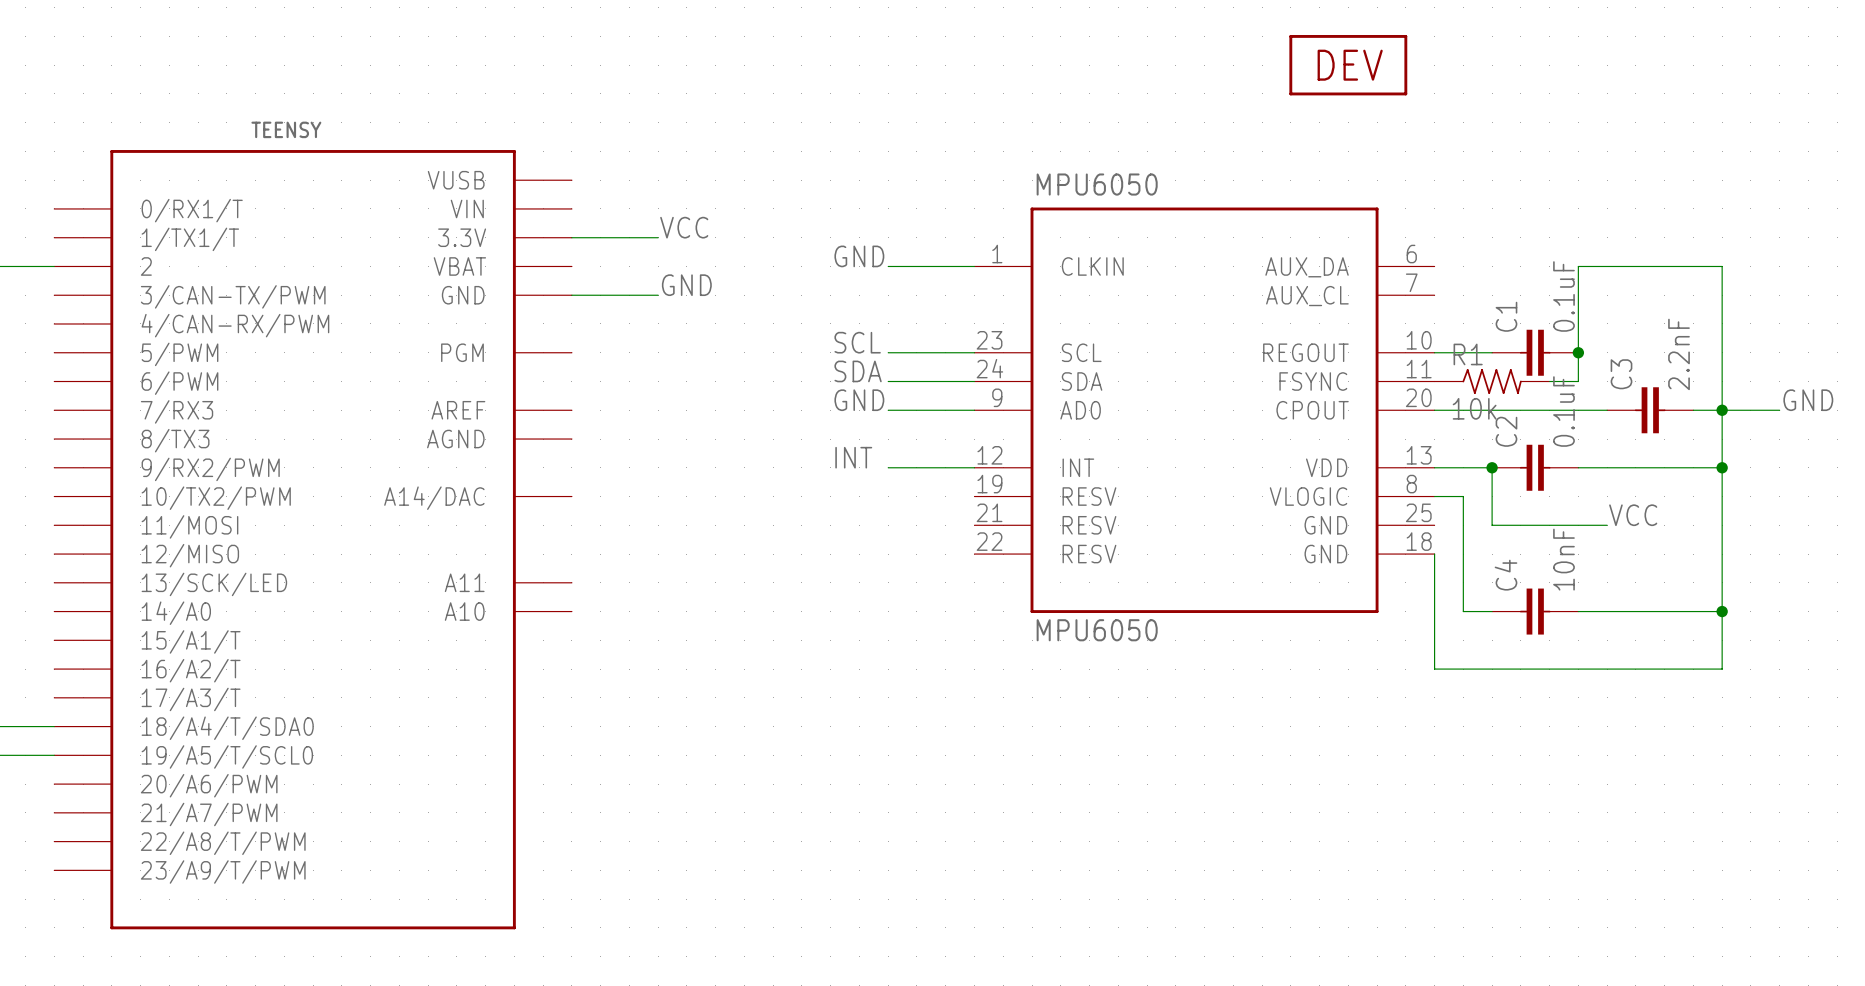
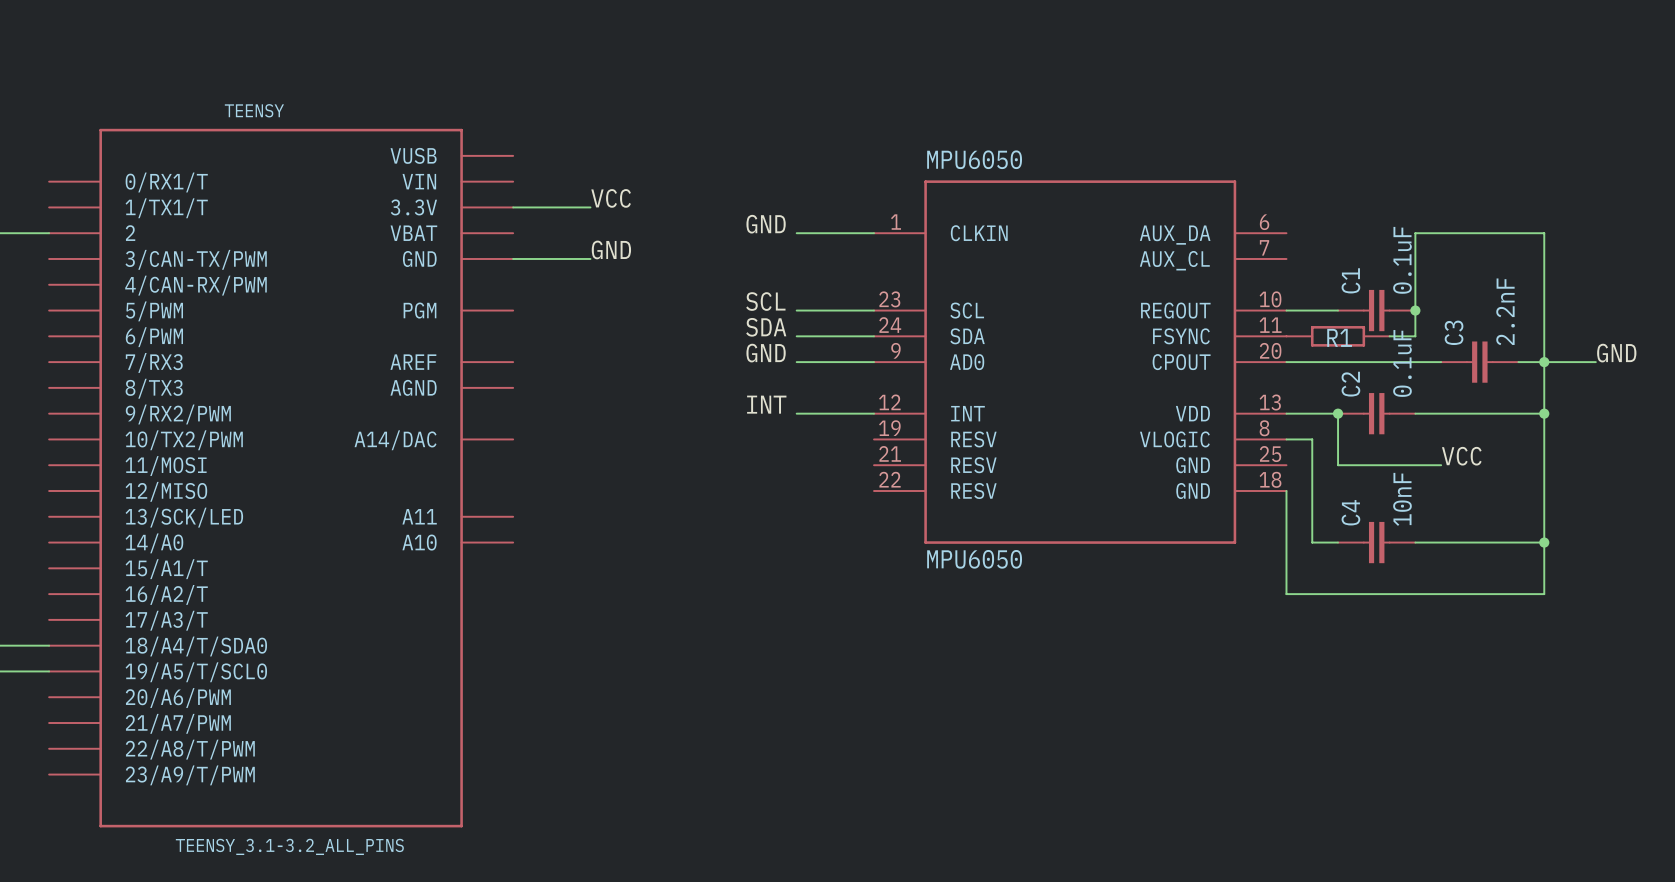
part: (1348, 65) -> none
R1 name position: R1 (1468, 354) -> R1 (1339, 337)
R1 symbol: [1434, 369, 1550, 394] -> [1286, 326, 1390, 347]
R1 value: 10k (1474, 408) -> none
TEENSY value: none -> TEENSY_3.1-3.2_ALL_PINS (289, 846)

